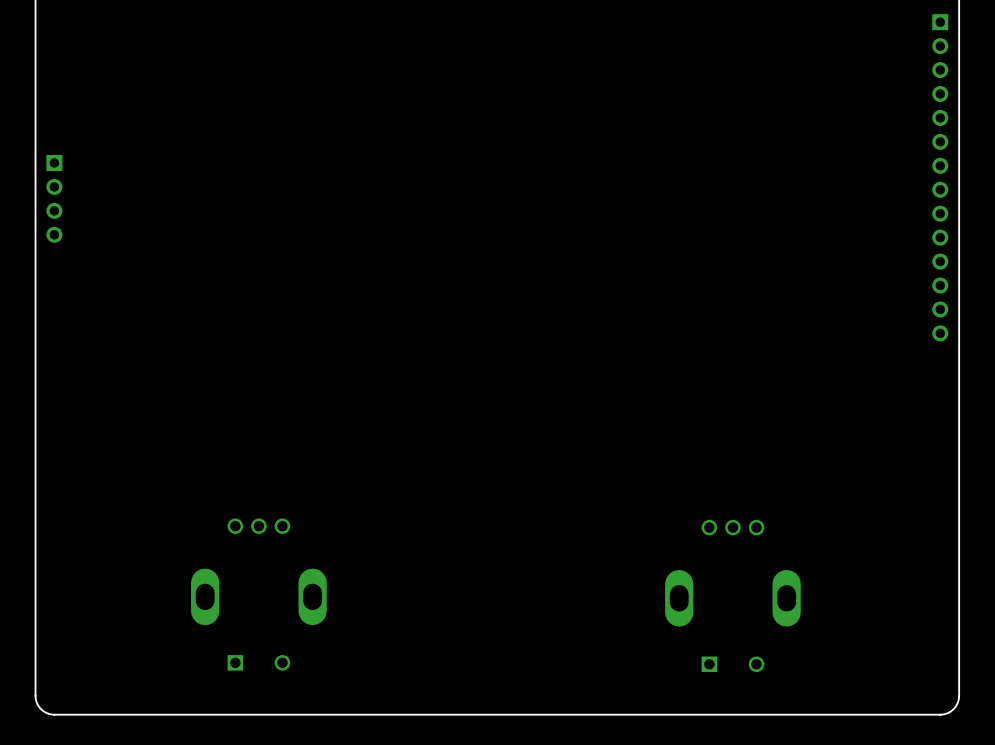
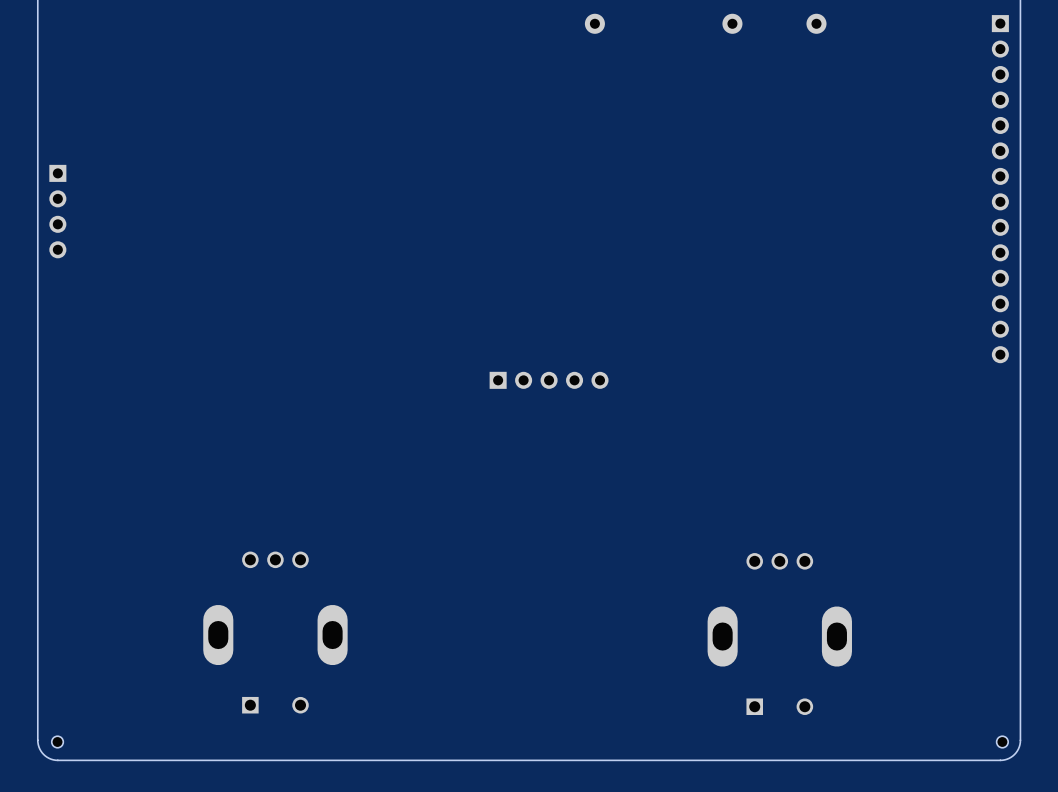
part: none -> (594, 23)
part: none -> (732, 23)
part: none -> (816, 23)
part: none -> (549, 380)
part: none -> (57, 741)
part: none -> (1002, 741)

